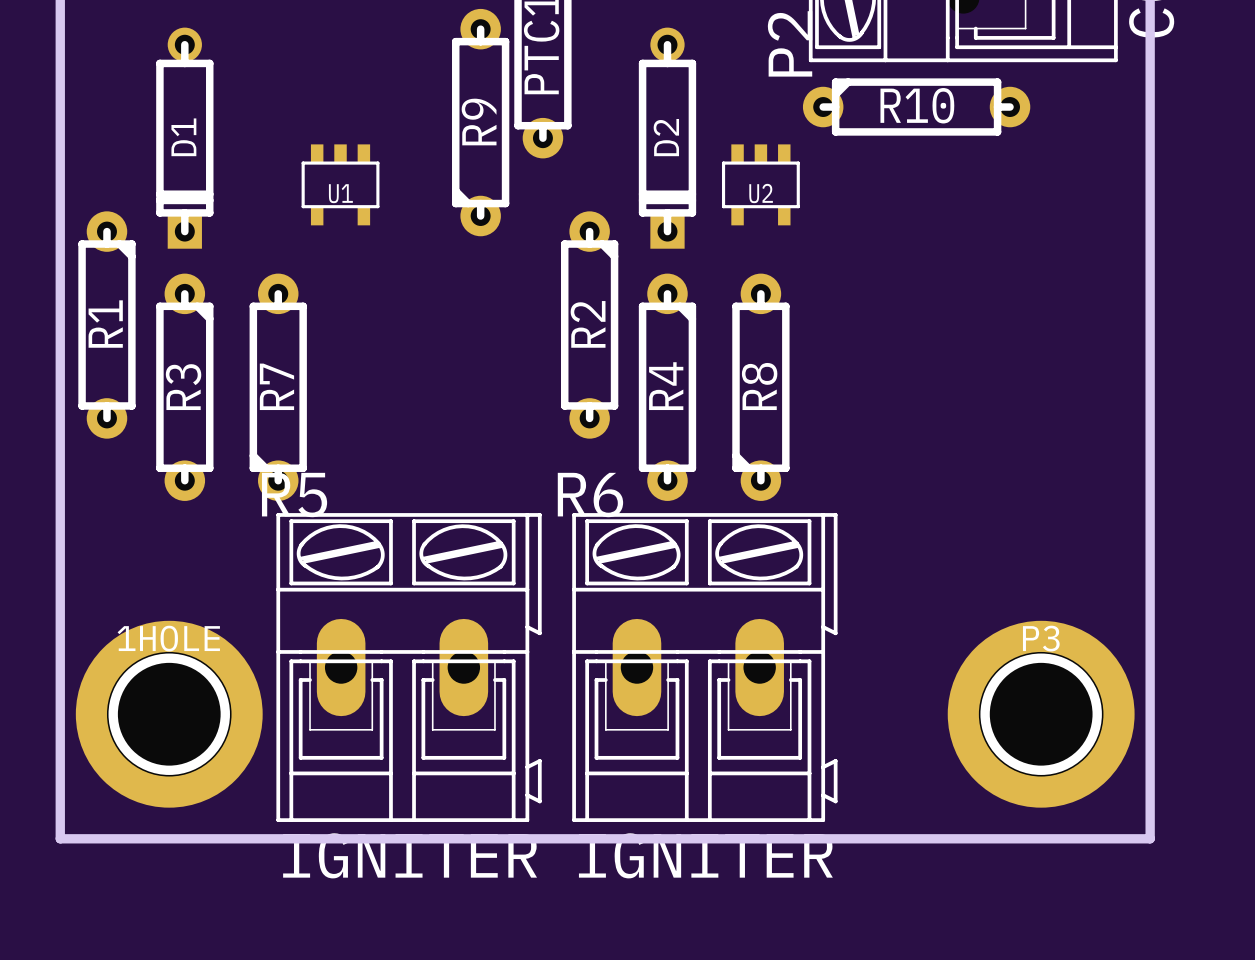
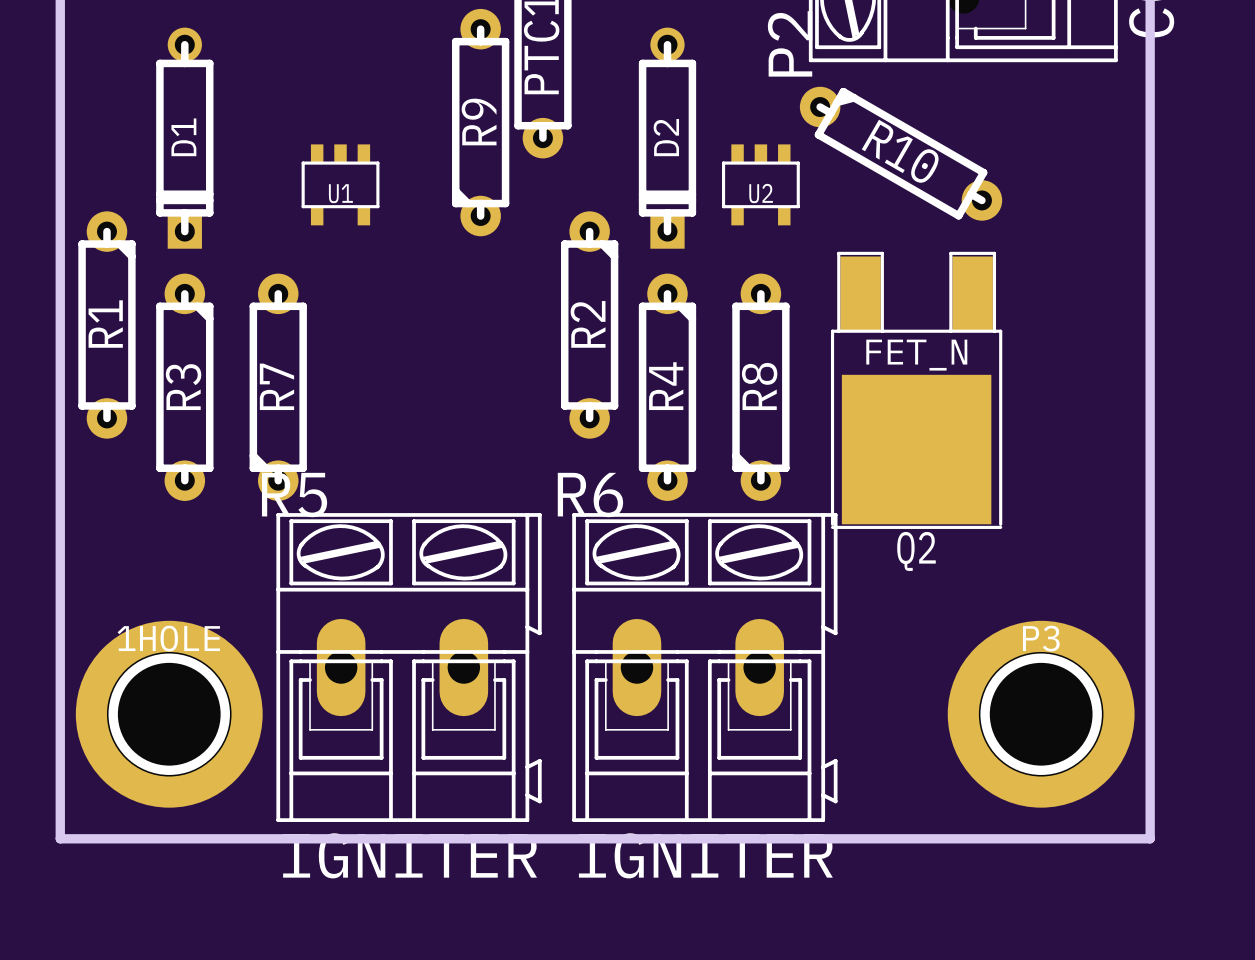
R10 rotation: 0° (916, 107) -> 30° clockwise (901, 153)
Q2: none -> FET_N (916, 390)

